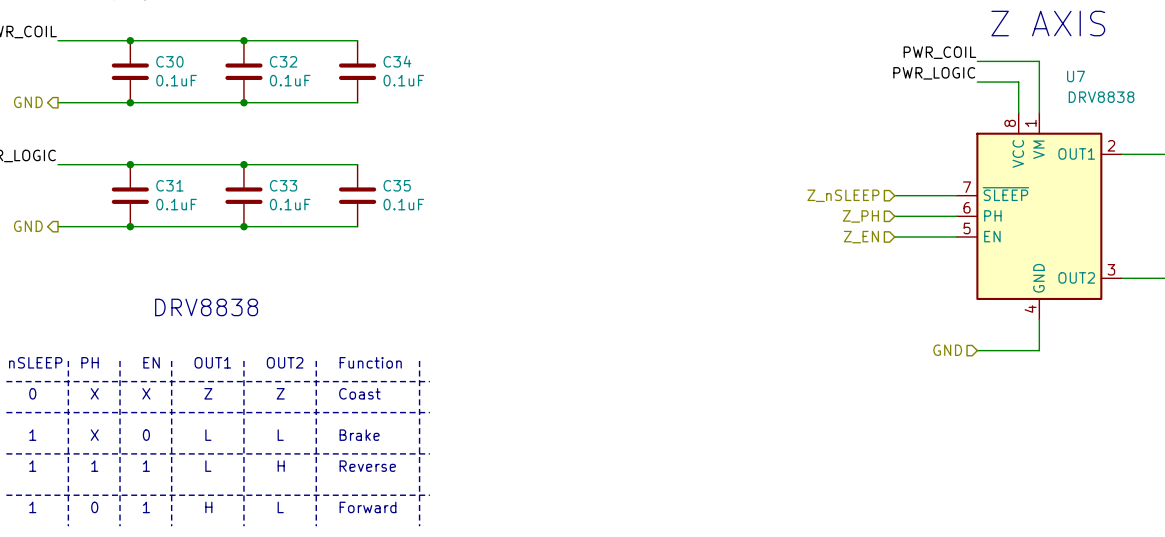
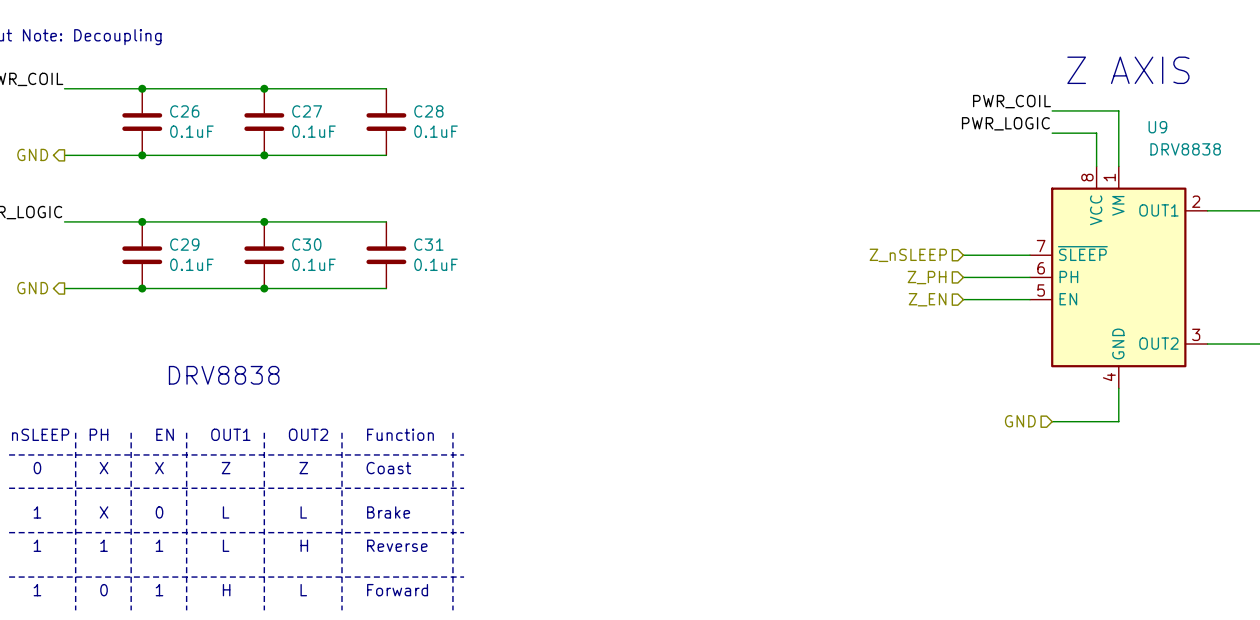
C30 name: C30 (169, 61) -> C26 (184, 111)
C32 name: C32 (283, 61) -> C27 (307, 111)
C34 name: C34 (397, 61) -> C28 (428, 111)
U7 name: U7 (1075, 76) -> U9 (1157, 127)
C31 name: C31 (169, 185) -> C29 (184, 244)
C33 name: C33 (283, 185) -> C30 (306, 244)
C35 name: C35 (397, 185) -> C31 (428, 244)

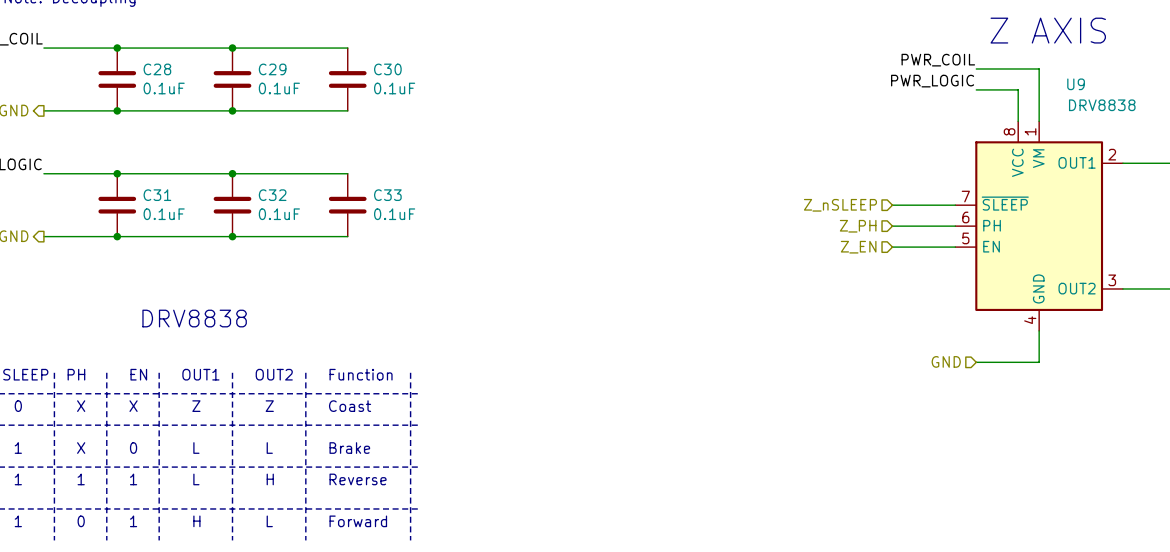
C26 name: C26 (184, 111) -> C28 (157, 69)
C27 name: C27 (307, 111) -> C29 (272, 69)
C28 name: C28 (428, 111) -> C30 (387, 69)
C29 name: C29 (184, 244) -> C31 (157, 195)
C30 name: C30 (306, 244) -> C32 (272, 195)
C31 name: C31 (428, 244) -> C33 (387, 195)

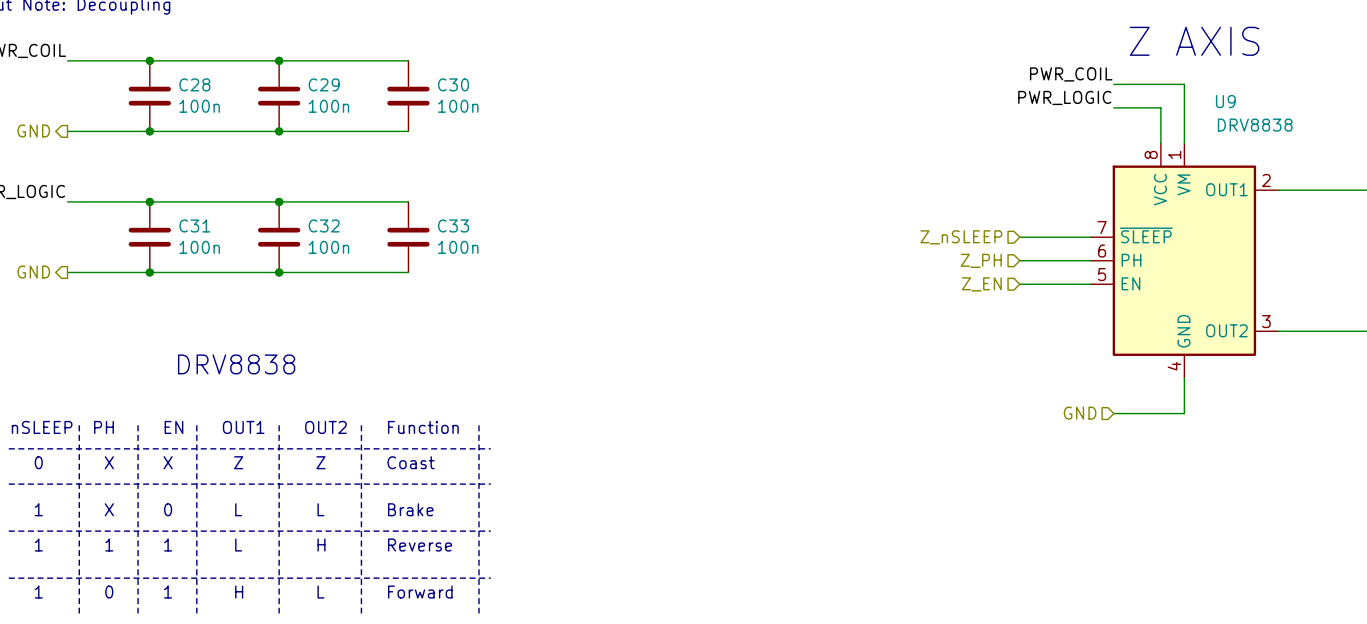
C28 value: 0.1uF (164, 88) -> 100n (199, 106)
C29 value: 0.1uF (279, 88) -> 100n (328, 106)
C30 value: 0.1uF (394, 88) -> 100n (458, 106)
C31 value: 0.1uF (164, 214) -> 100n (199, 247)
C32 value: 0.1uF (279, 214) -> 100n (328, 247)
C33 value: 0.1uF (394, 214) -> 100n (458, 247)

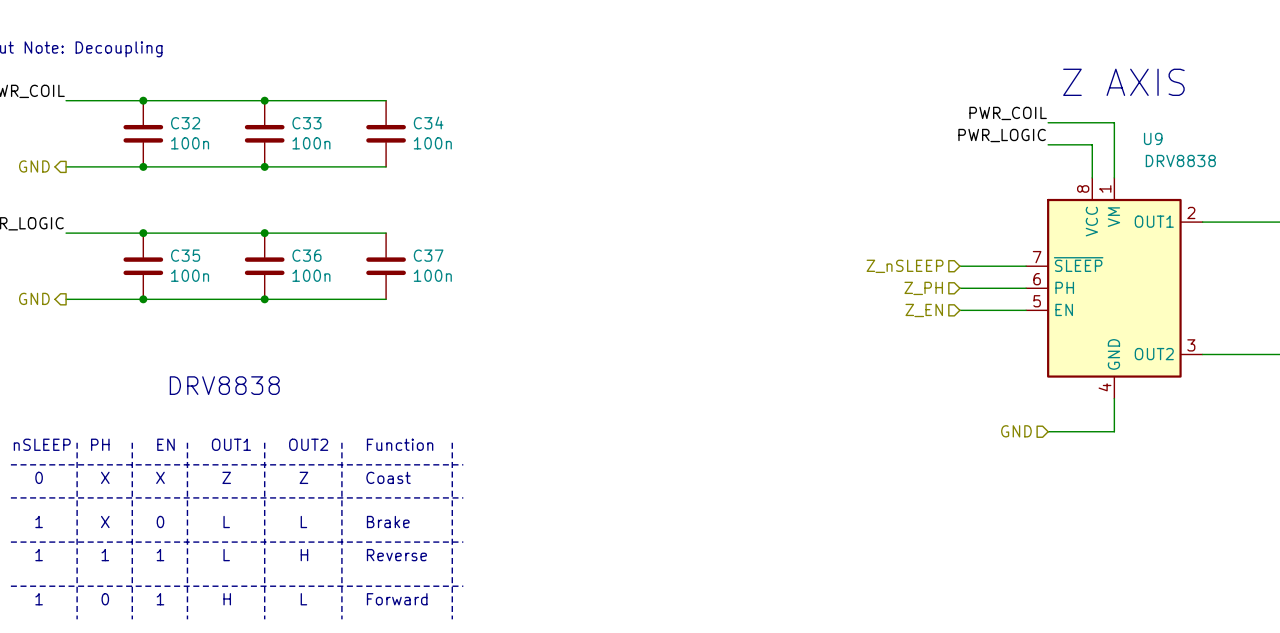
C28 name: C28 (194, 84) -> C32 (185, 123)
C29 name: C29 (324, 84) -> C33 (306, 123)
C30 name: C30 (453, 84) -> C34 (428, 122)
C31 name: C31 (194, 225) -> C35 (185, 255)
C32 name: C32 (324, 225) -> C36 (306, 255)
C33 name: C33 (453, 225) -> C37 (428, 255)

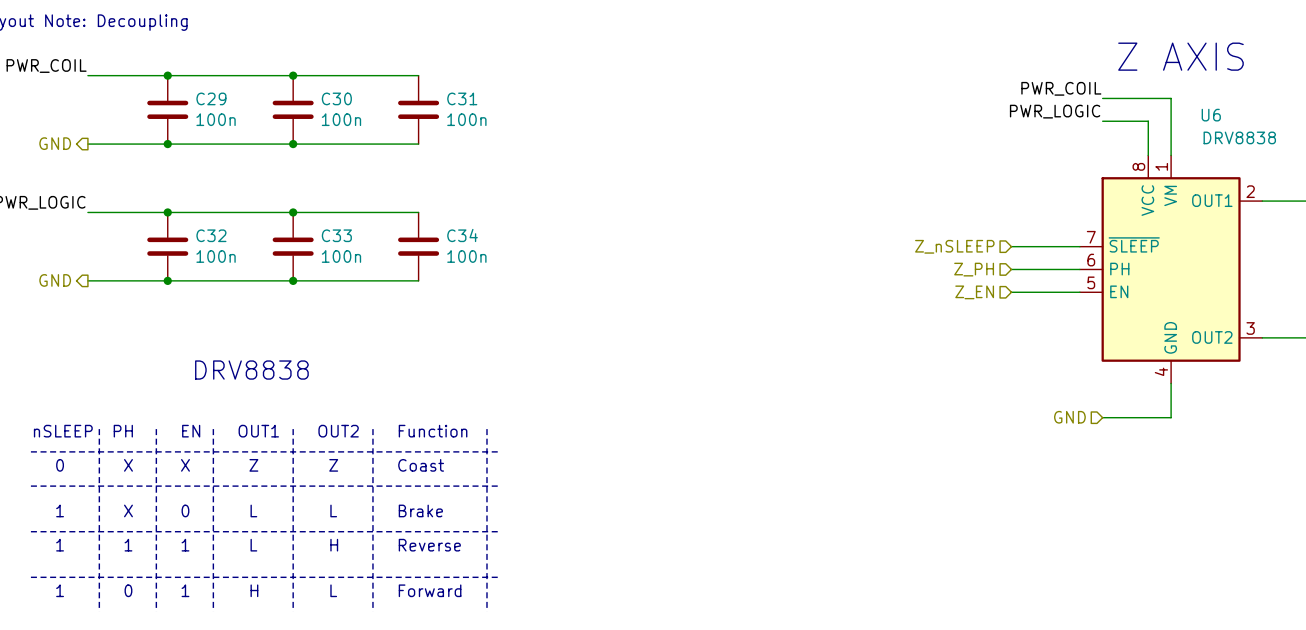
C34 name: C34 (428, 122) -> C31 (462, 98)
C32 name: C32 (185, 123) -> C29 (211, 98)
C33 name: C33 (306, 123) -> C30 (336, 98)
U9 name: U9 (1153, 138) -> U6 (1211, 115)
C35 name: C35 (185, 255) -> C32 (211, 235)
C36 name: C36 (306, 255) -> C33 (336, 235)
C37 name: C37 (428, 255) -> C34 (462, 235)

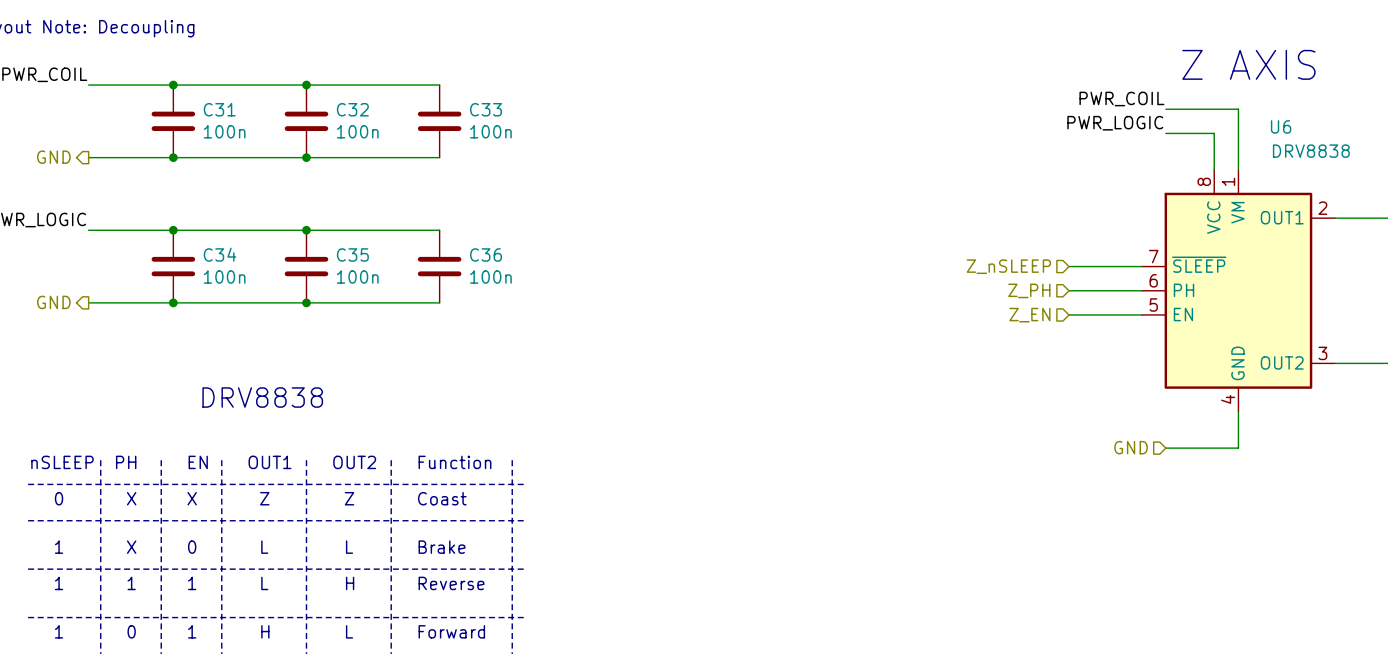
C29 name: C29 (211, 98) -> C31 (219, 109)
C30 name: C30 (336, 98) -> C32 (352, 109)
C31 name: C31 (462, 98) -> C33 (485, 109)
C32 name: C32 (211, 235) -> C34 (220, 254)
C33 name: C33 (336, 235) -> C35 (352, 254)
C34 name: C34 (462, 235) -> C36 (485, 254)

